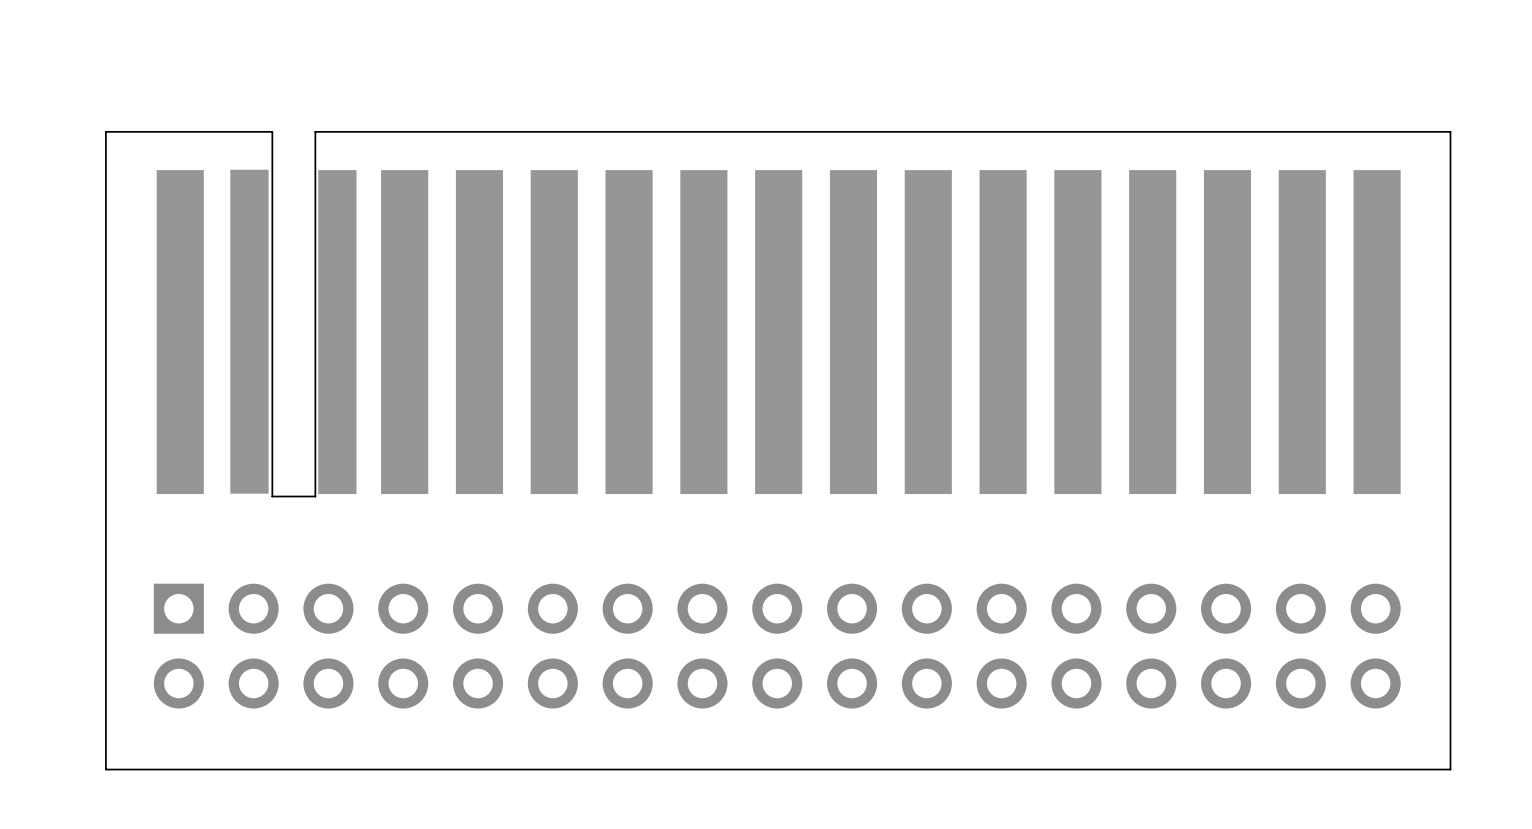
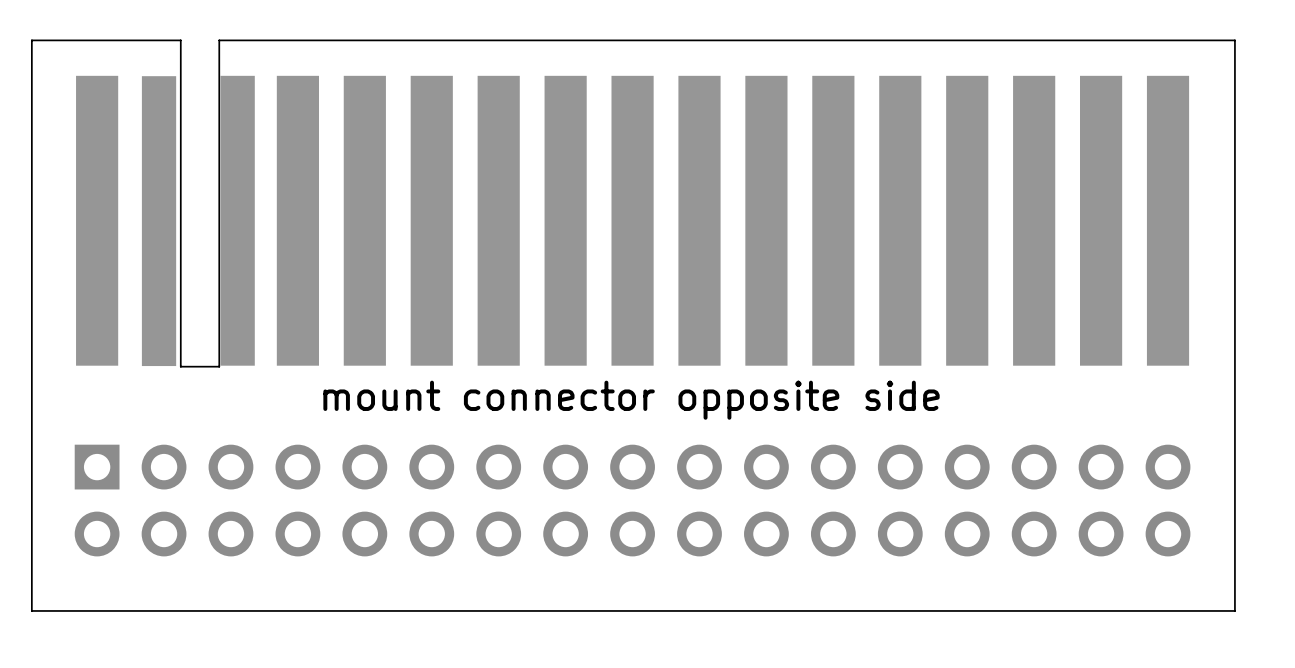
part side: top (778, 331) -> bottom (632, 220)
text: none -> mount connector opposite side (631, 400)

